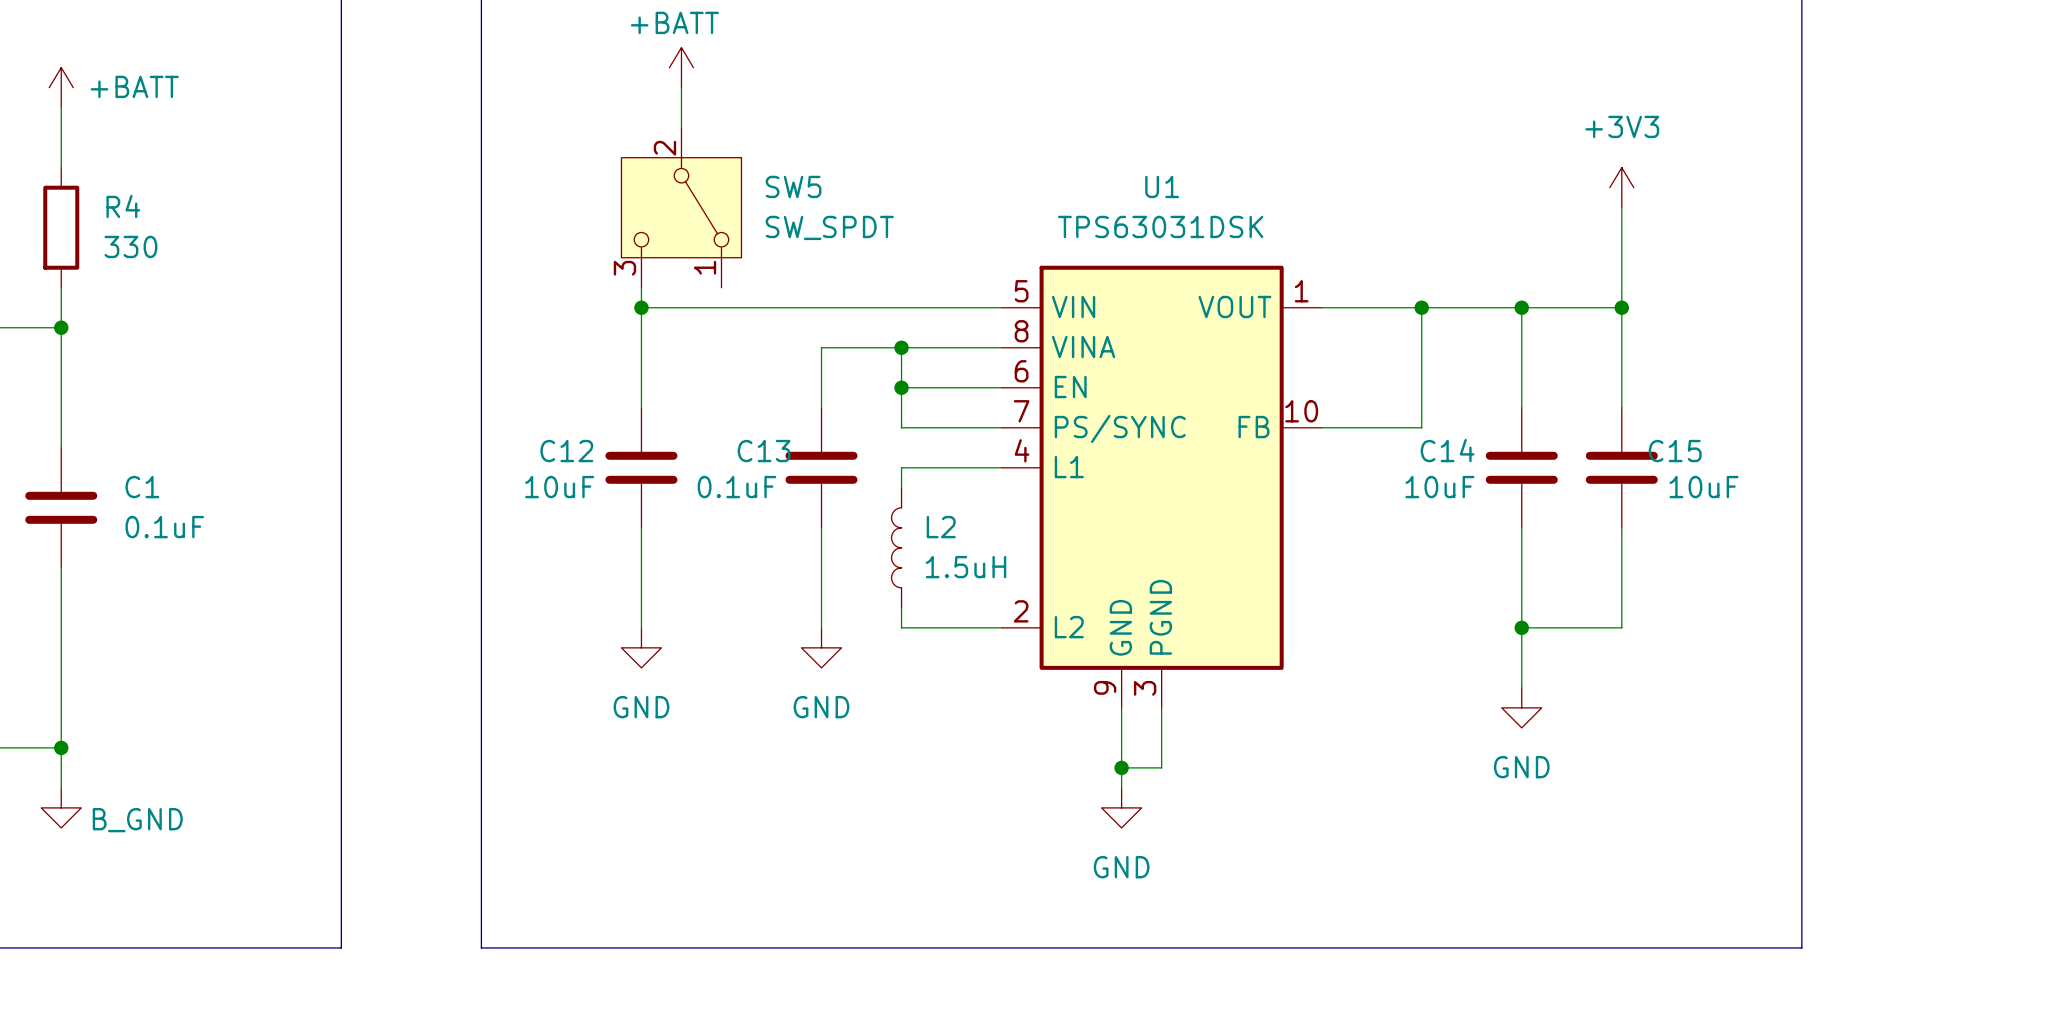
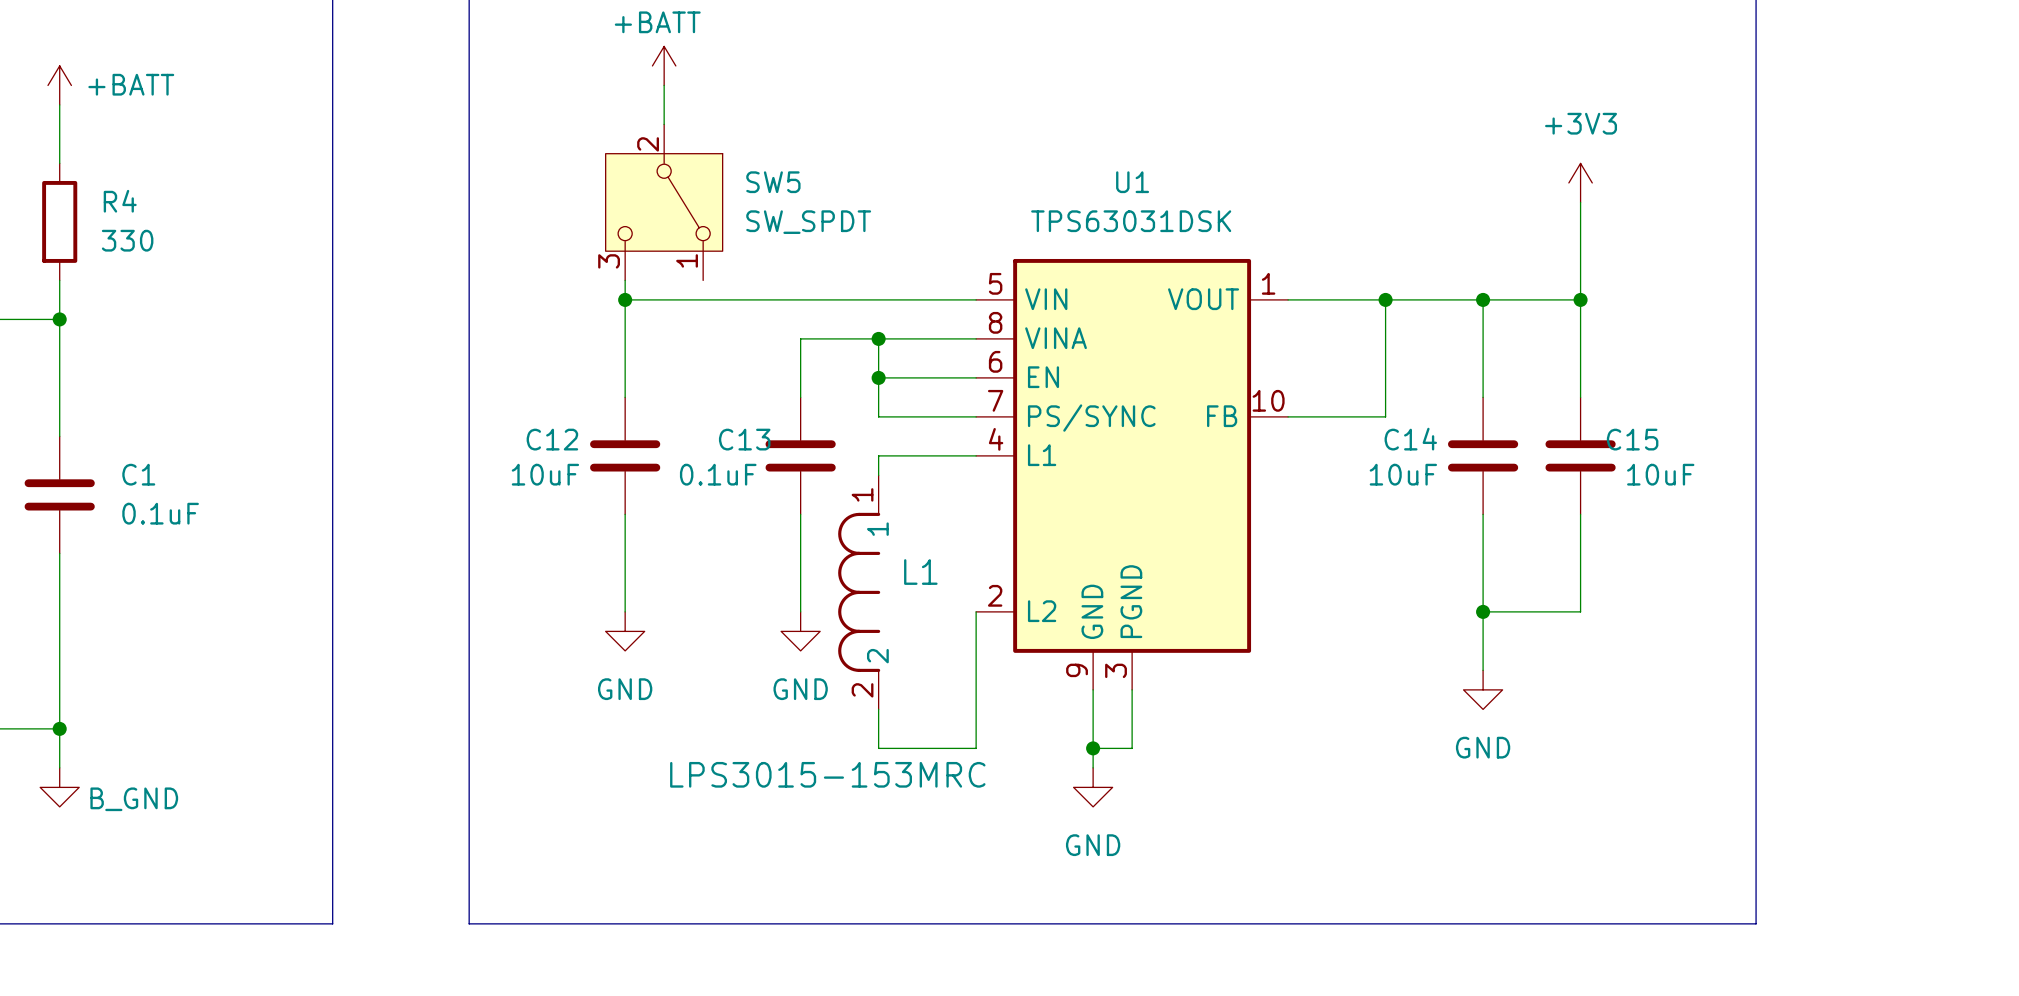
L2: 1.5uH (896, 547) -> none
L1: none -> LPS3015-153MRC (859, 592)
wire: (901, 607) (901, 627) (1001, 627) -> (878, 709) (878, 748) (976, 748) (976, 611)

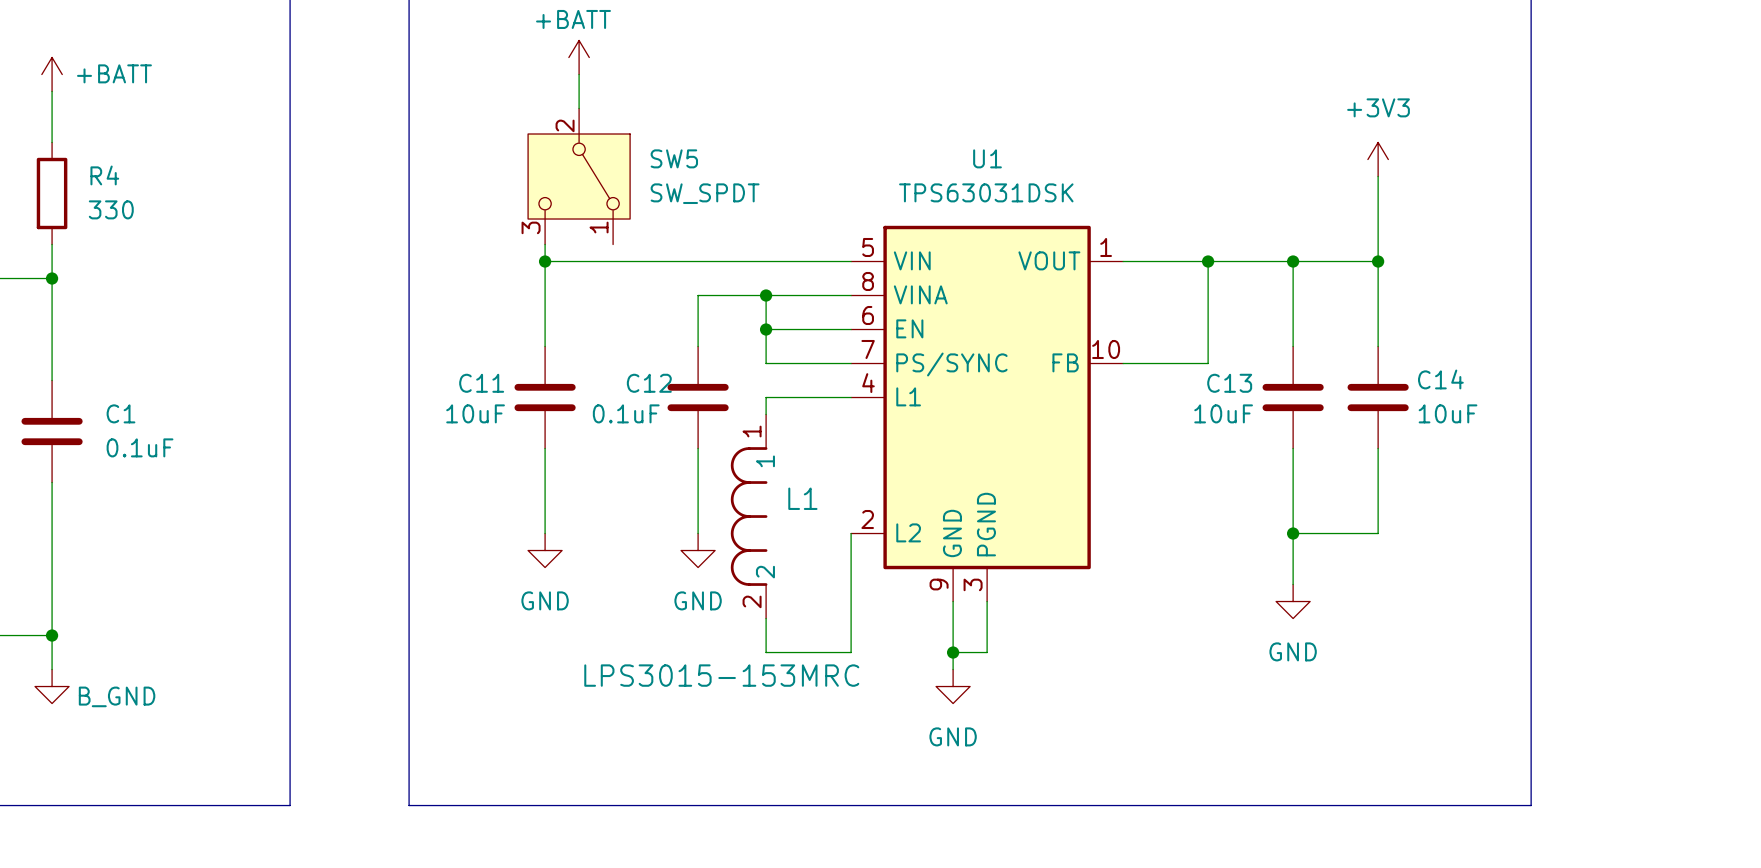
C12 name: C12 (552, 439) -> C11 (481, 383)
C13 name: C13 (744, 439) -> C12 (649, 383)
C14 name: C14 (1410, 439) -> C13 (1229, 383)
C15 name: C15 (1632, 439) -> C14 (1440, 379)

